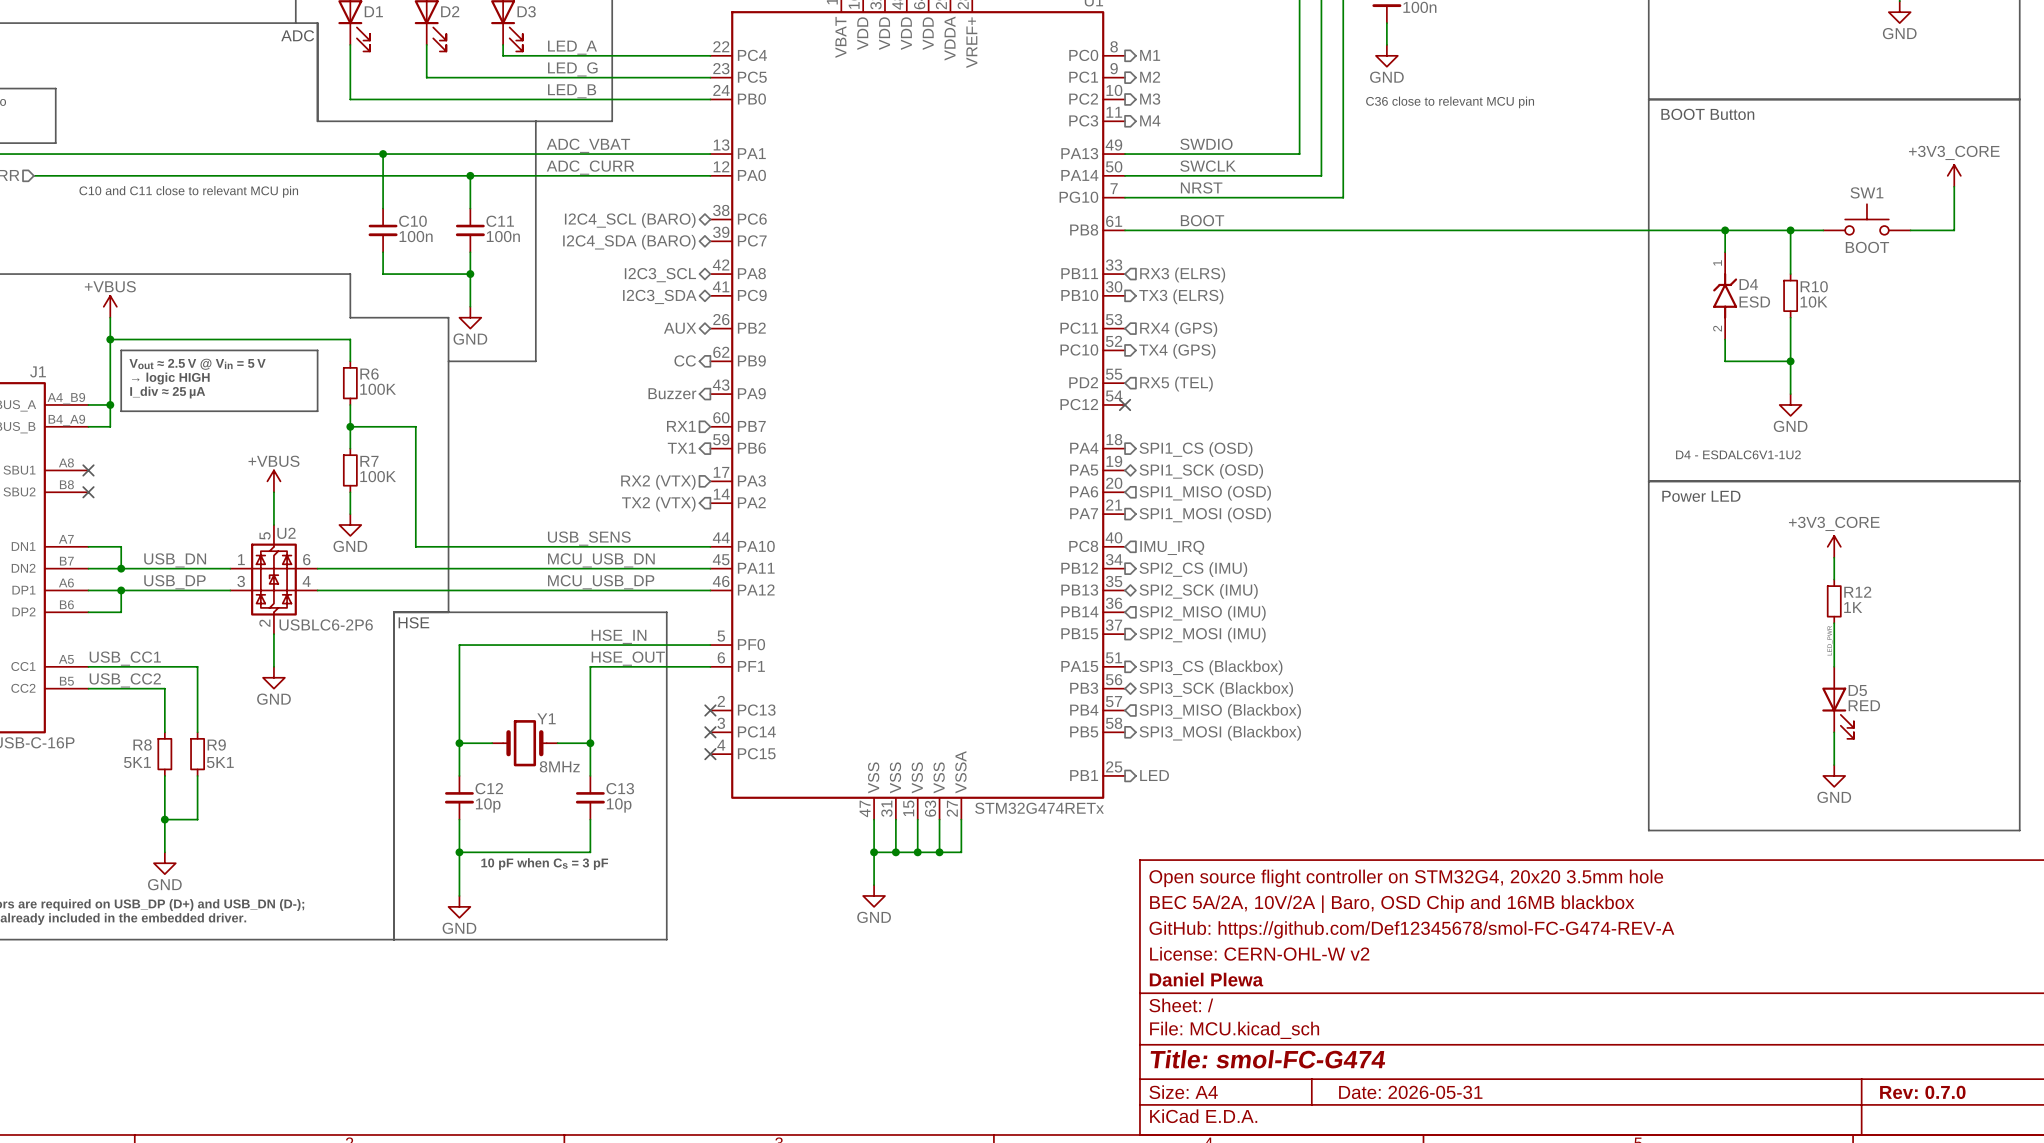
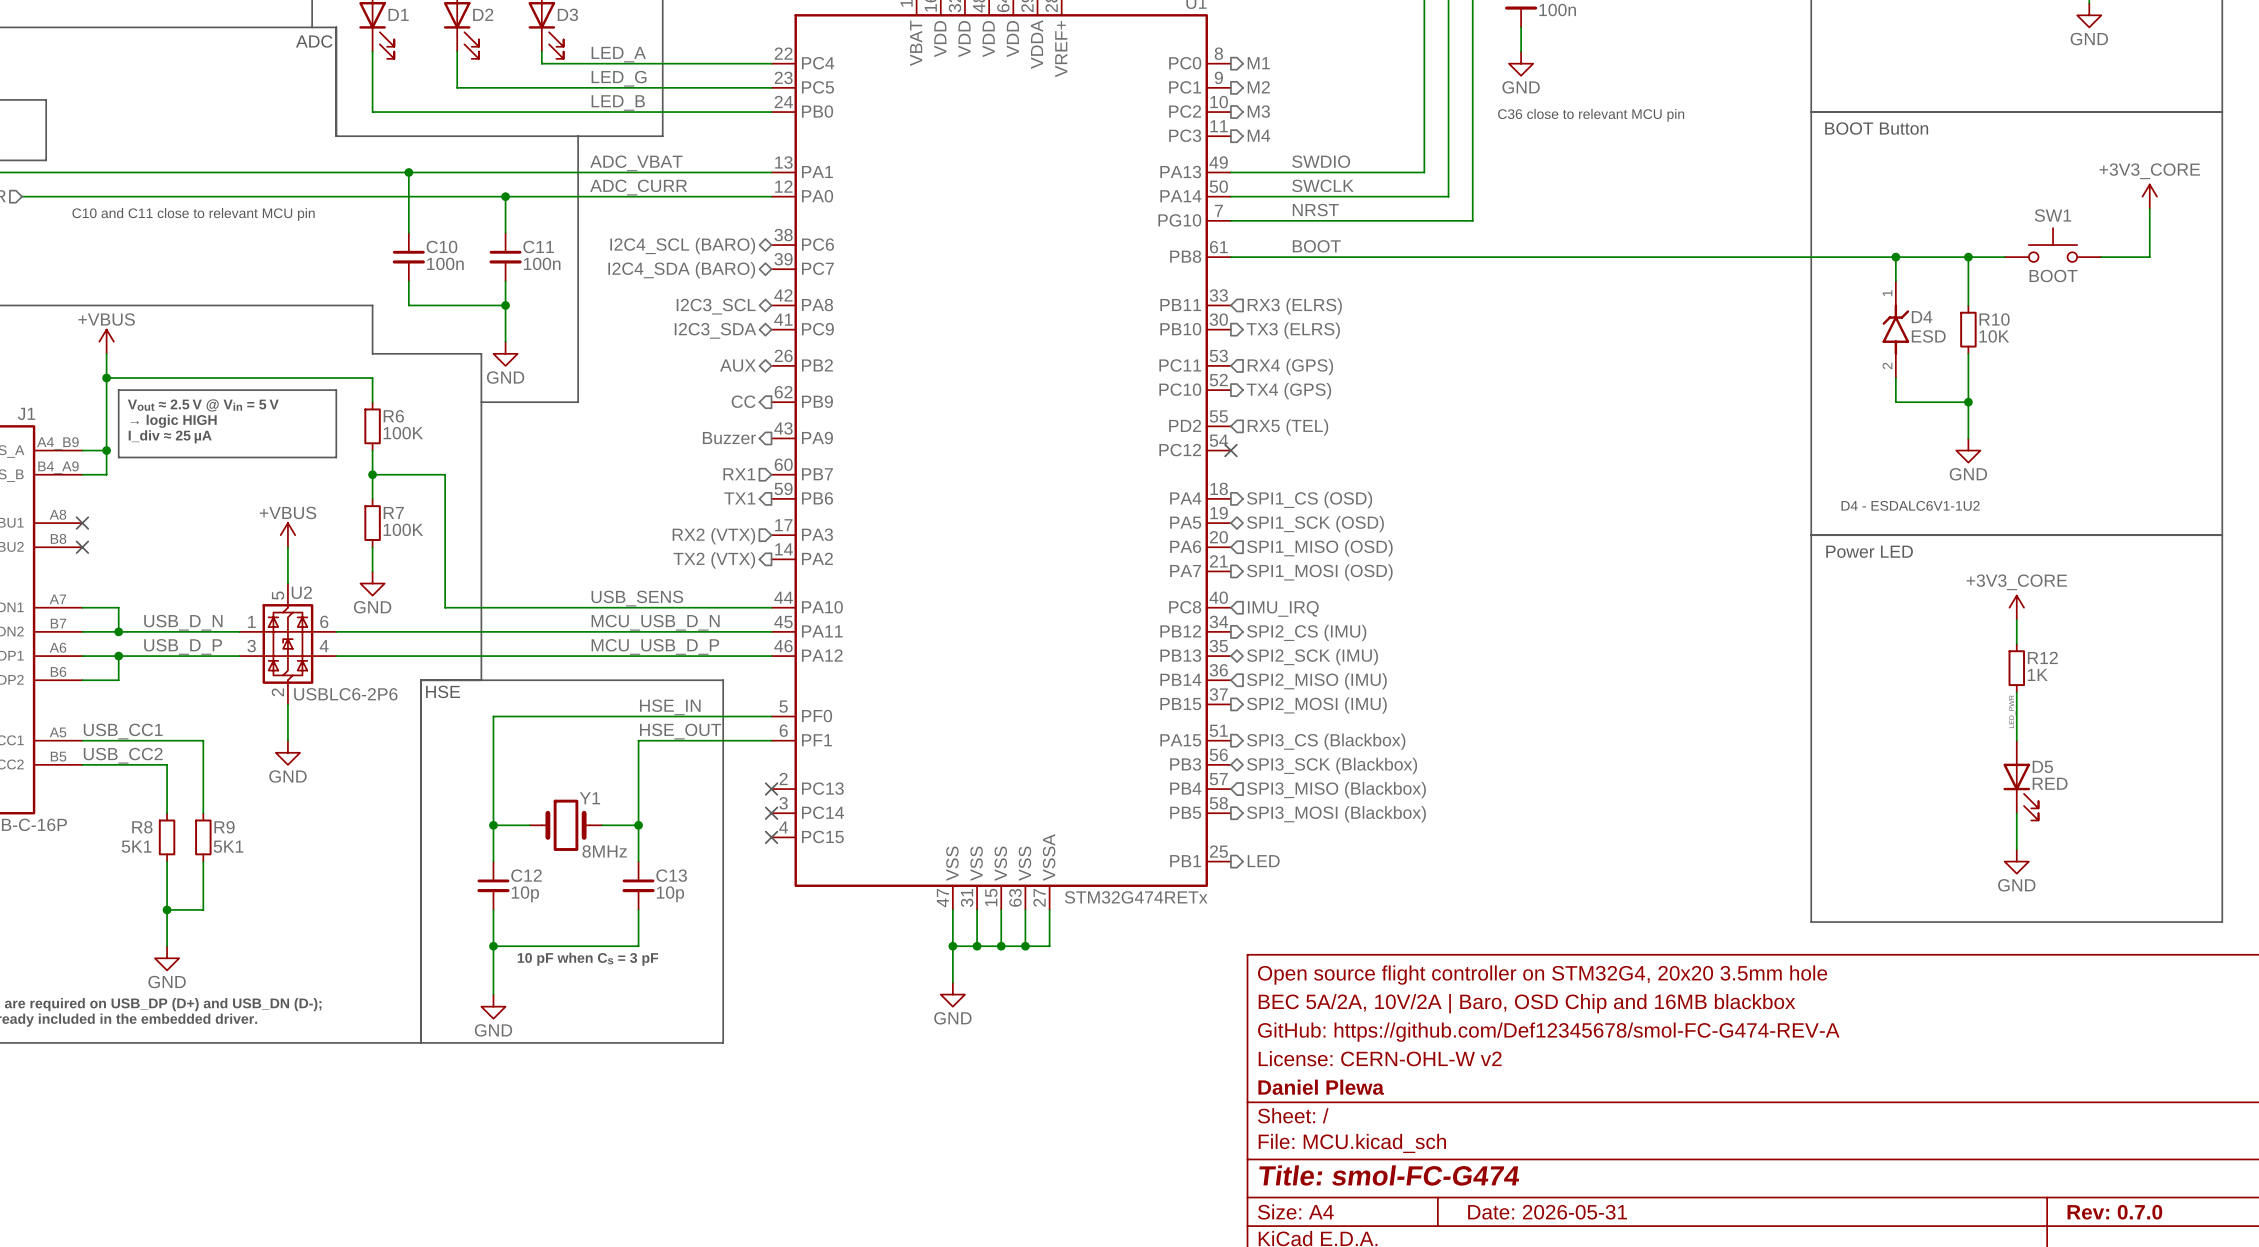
label: USB_DN (175, 560) -> USB_D_N (183, 622)
label: MCU_USB_DN (601, 560) -> MCU_USB_D_N (655, 622)
label: USB_DP (174, 582) -> USB_D_P (183, 646)
label: MCU_USB_DP (601, 582) -> MCU_USB_D_P (655, 646)

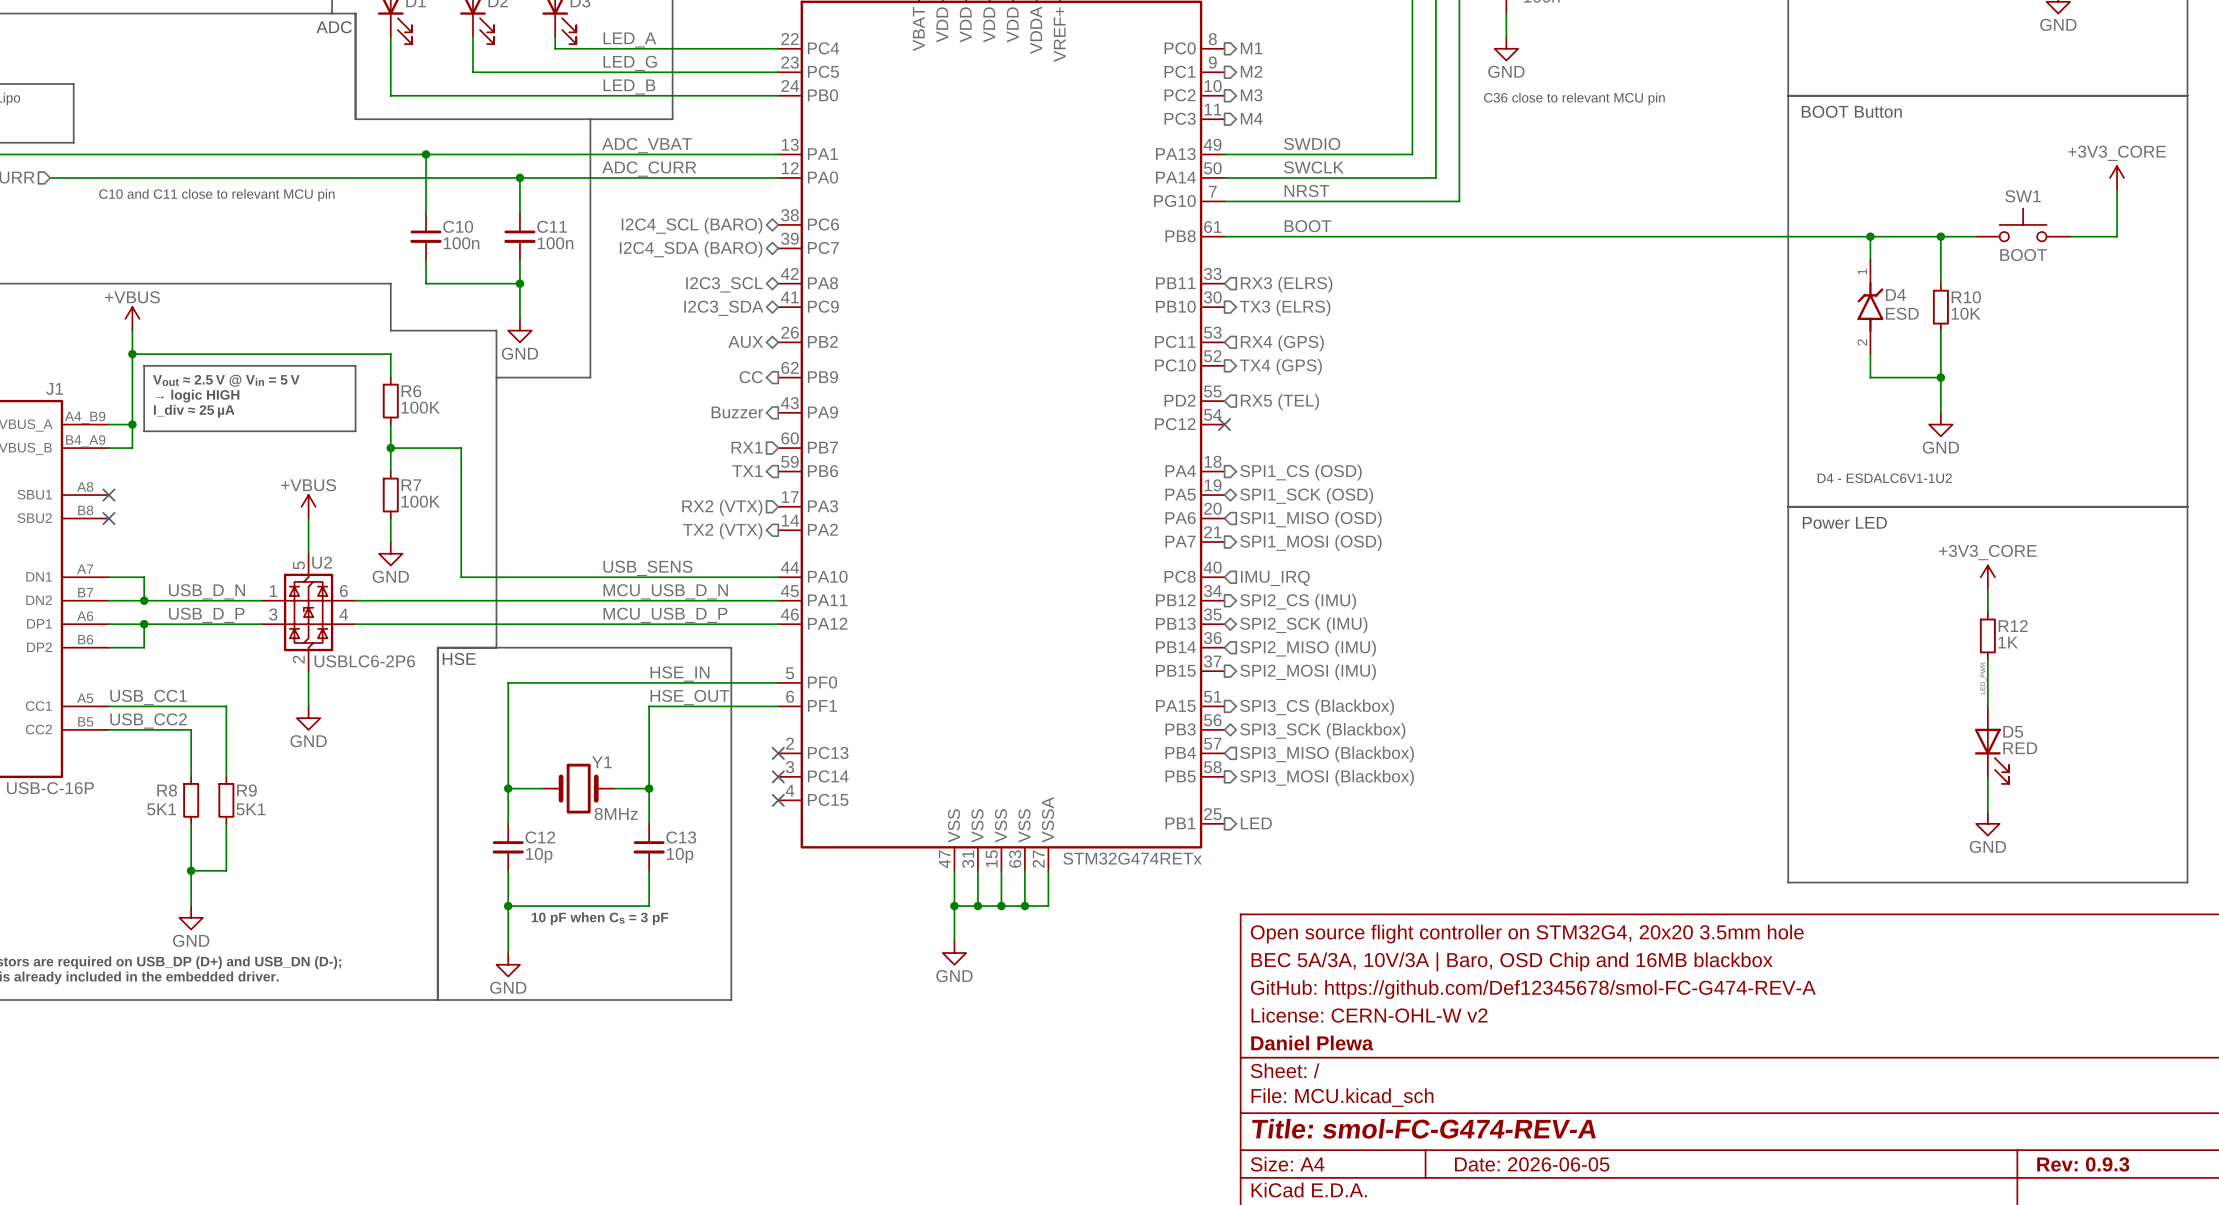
title block: BEC 5A/2A, 10V/2A | Baro, OSD Chip and 16MB blackbox (1526, 1003) -> BEC 5A/3A, 10V/3A | Baro, OSD Chip and 16MB blackbox (1512, 961)
title block: Title: smol-FC-G474 (1389, 1175) -> Title: smol-FC-G474-REV-A (1423, 1128)
title block: Date: 2026-05-31 (1547, 1212) -> Date: 2026-06-05 (1532, 1164)
title block: Rev: 0.7.0 (2114, 1212) -> Rev: 0.9.3 (2083, 1164)

